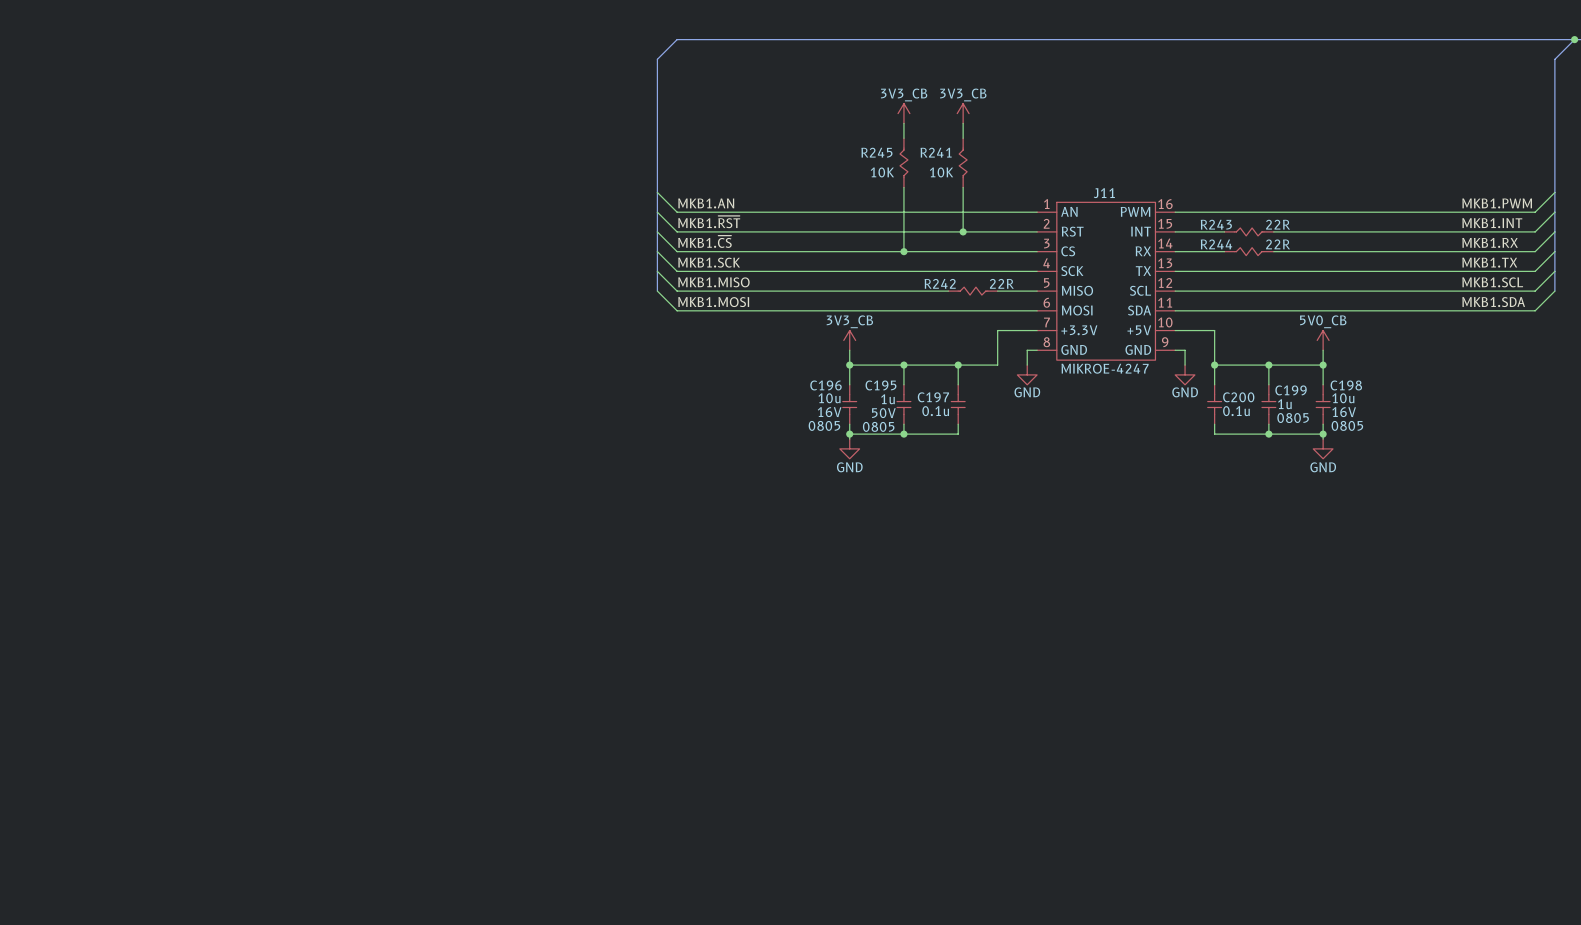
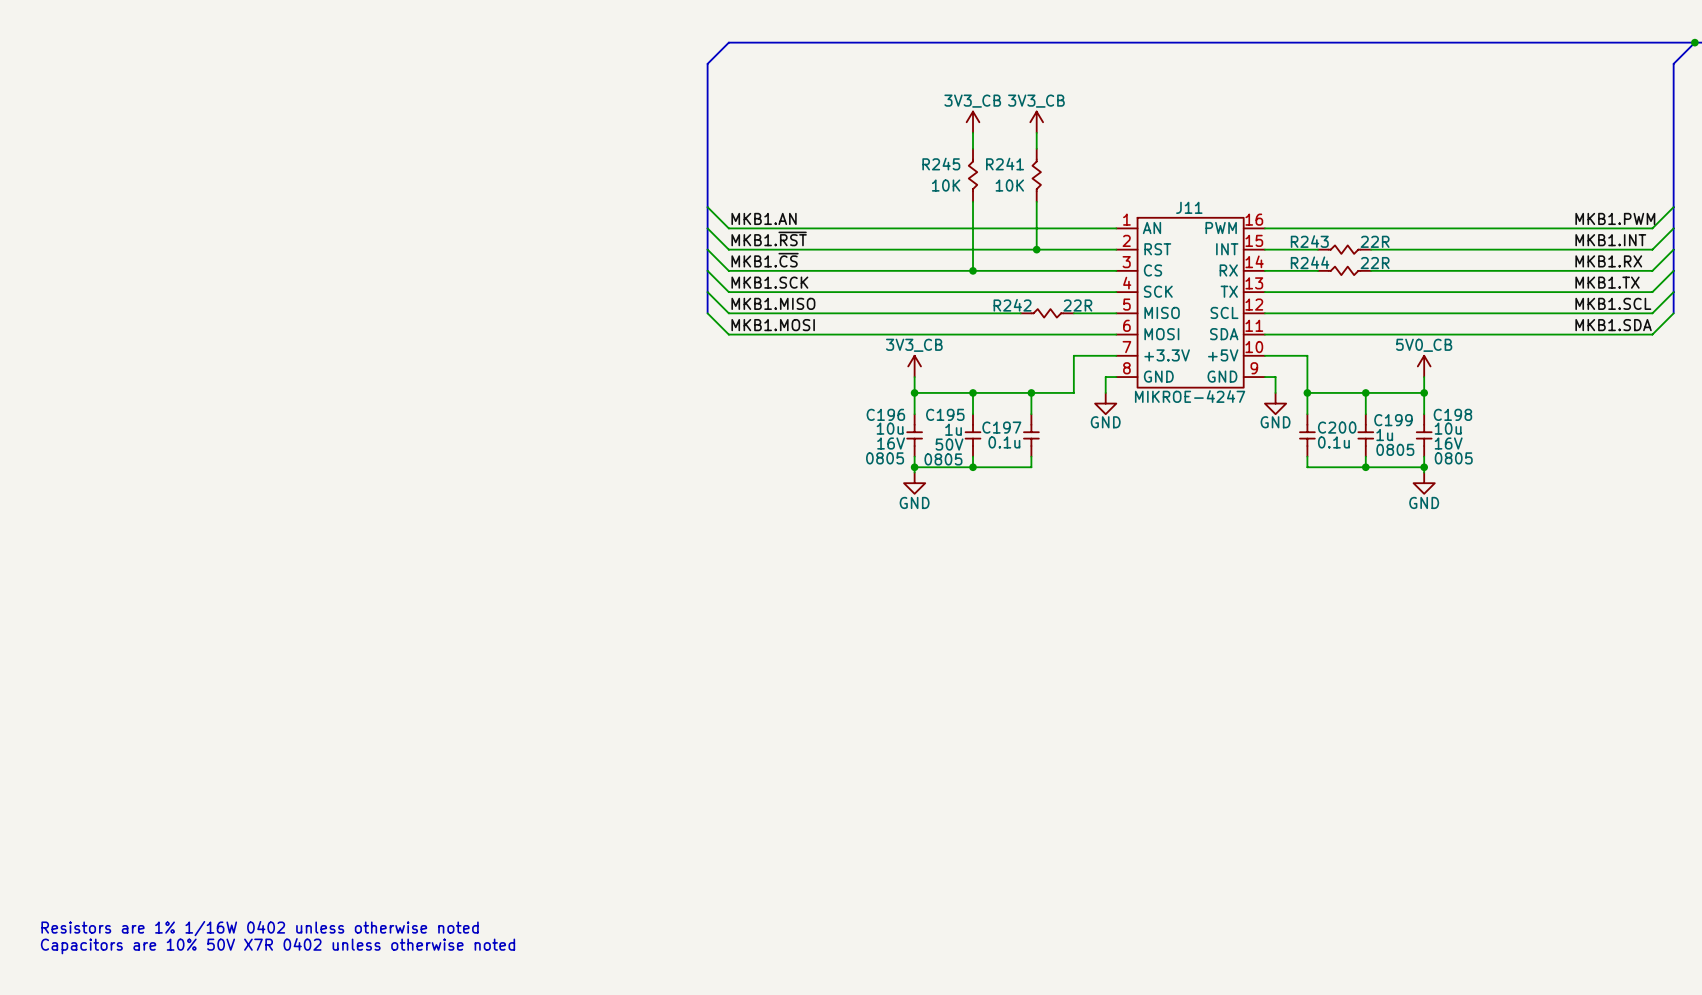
text: none -> Resistors are 1% 1/16W 0402 unless otherwise noted (260, 928)
text: none -> Capacitors are 10% 50V X7R 0402 unless otherwise noted (278, 946)

